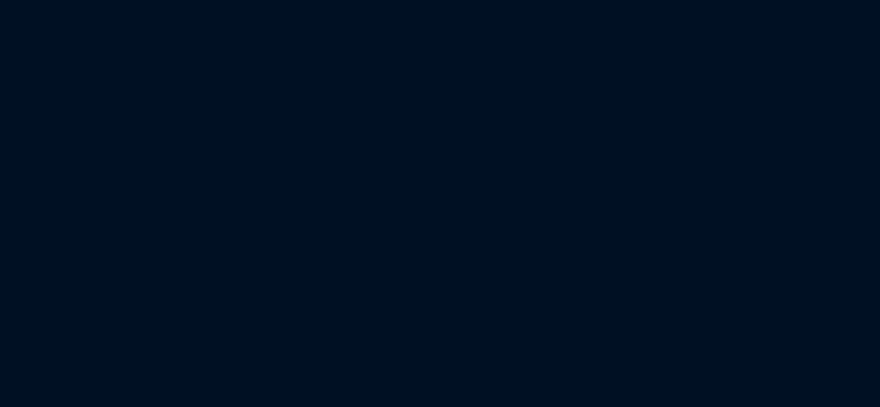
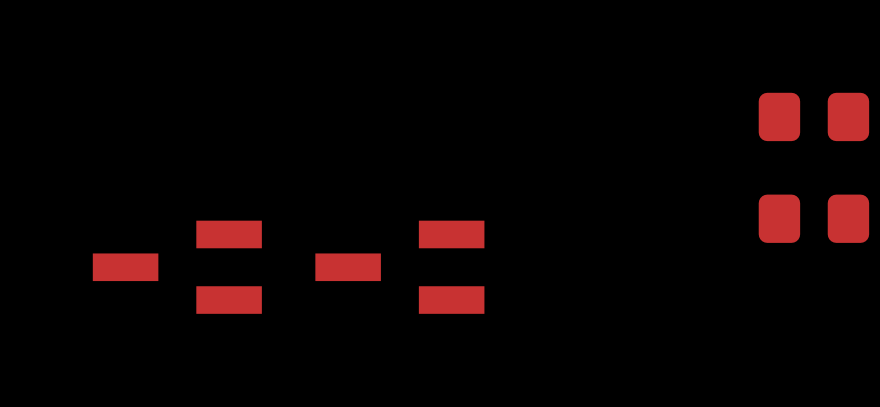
part: none -> (813, 116)
part: none -> (813, 218)
part: none -> (177, 267)
part: none -> (399, 267)

